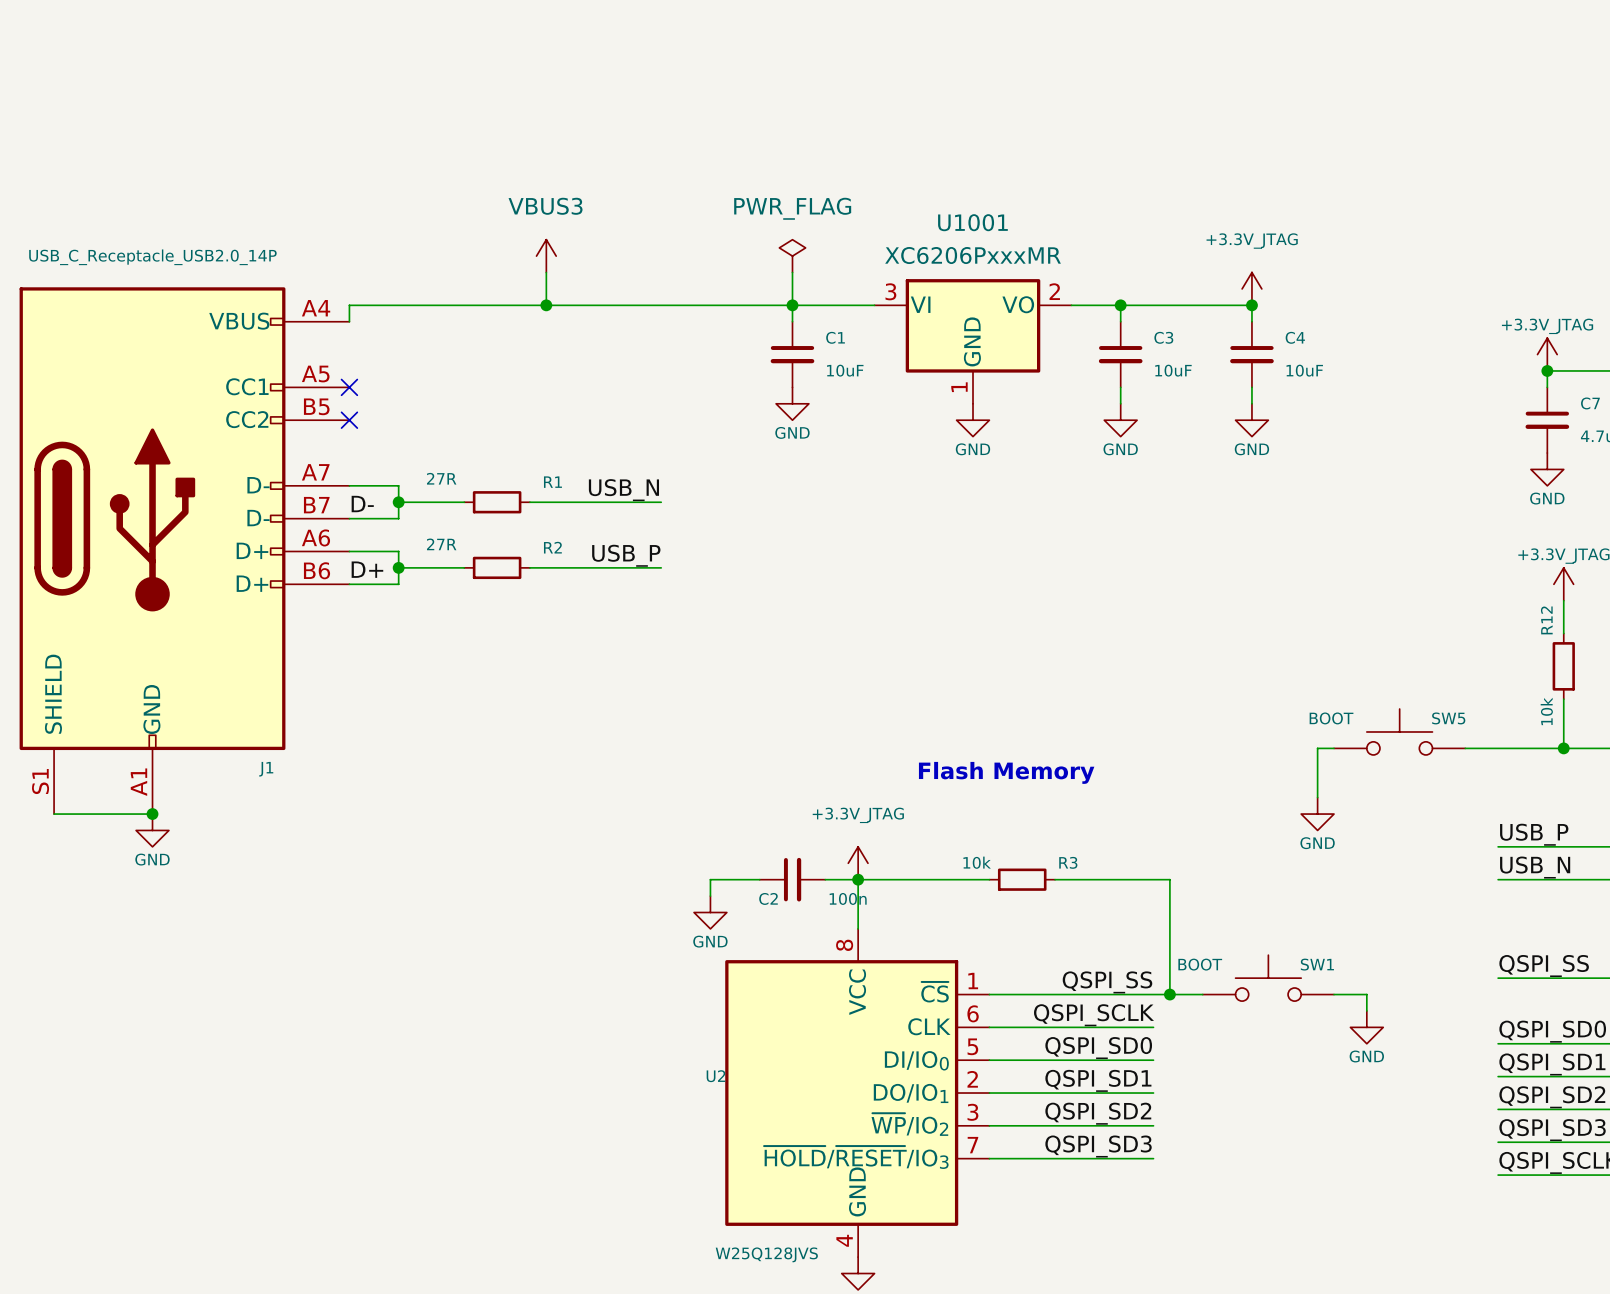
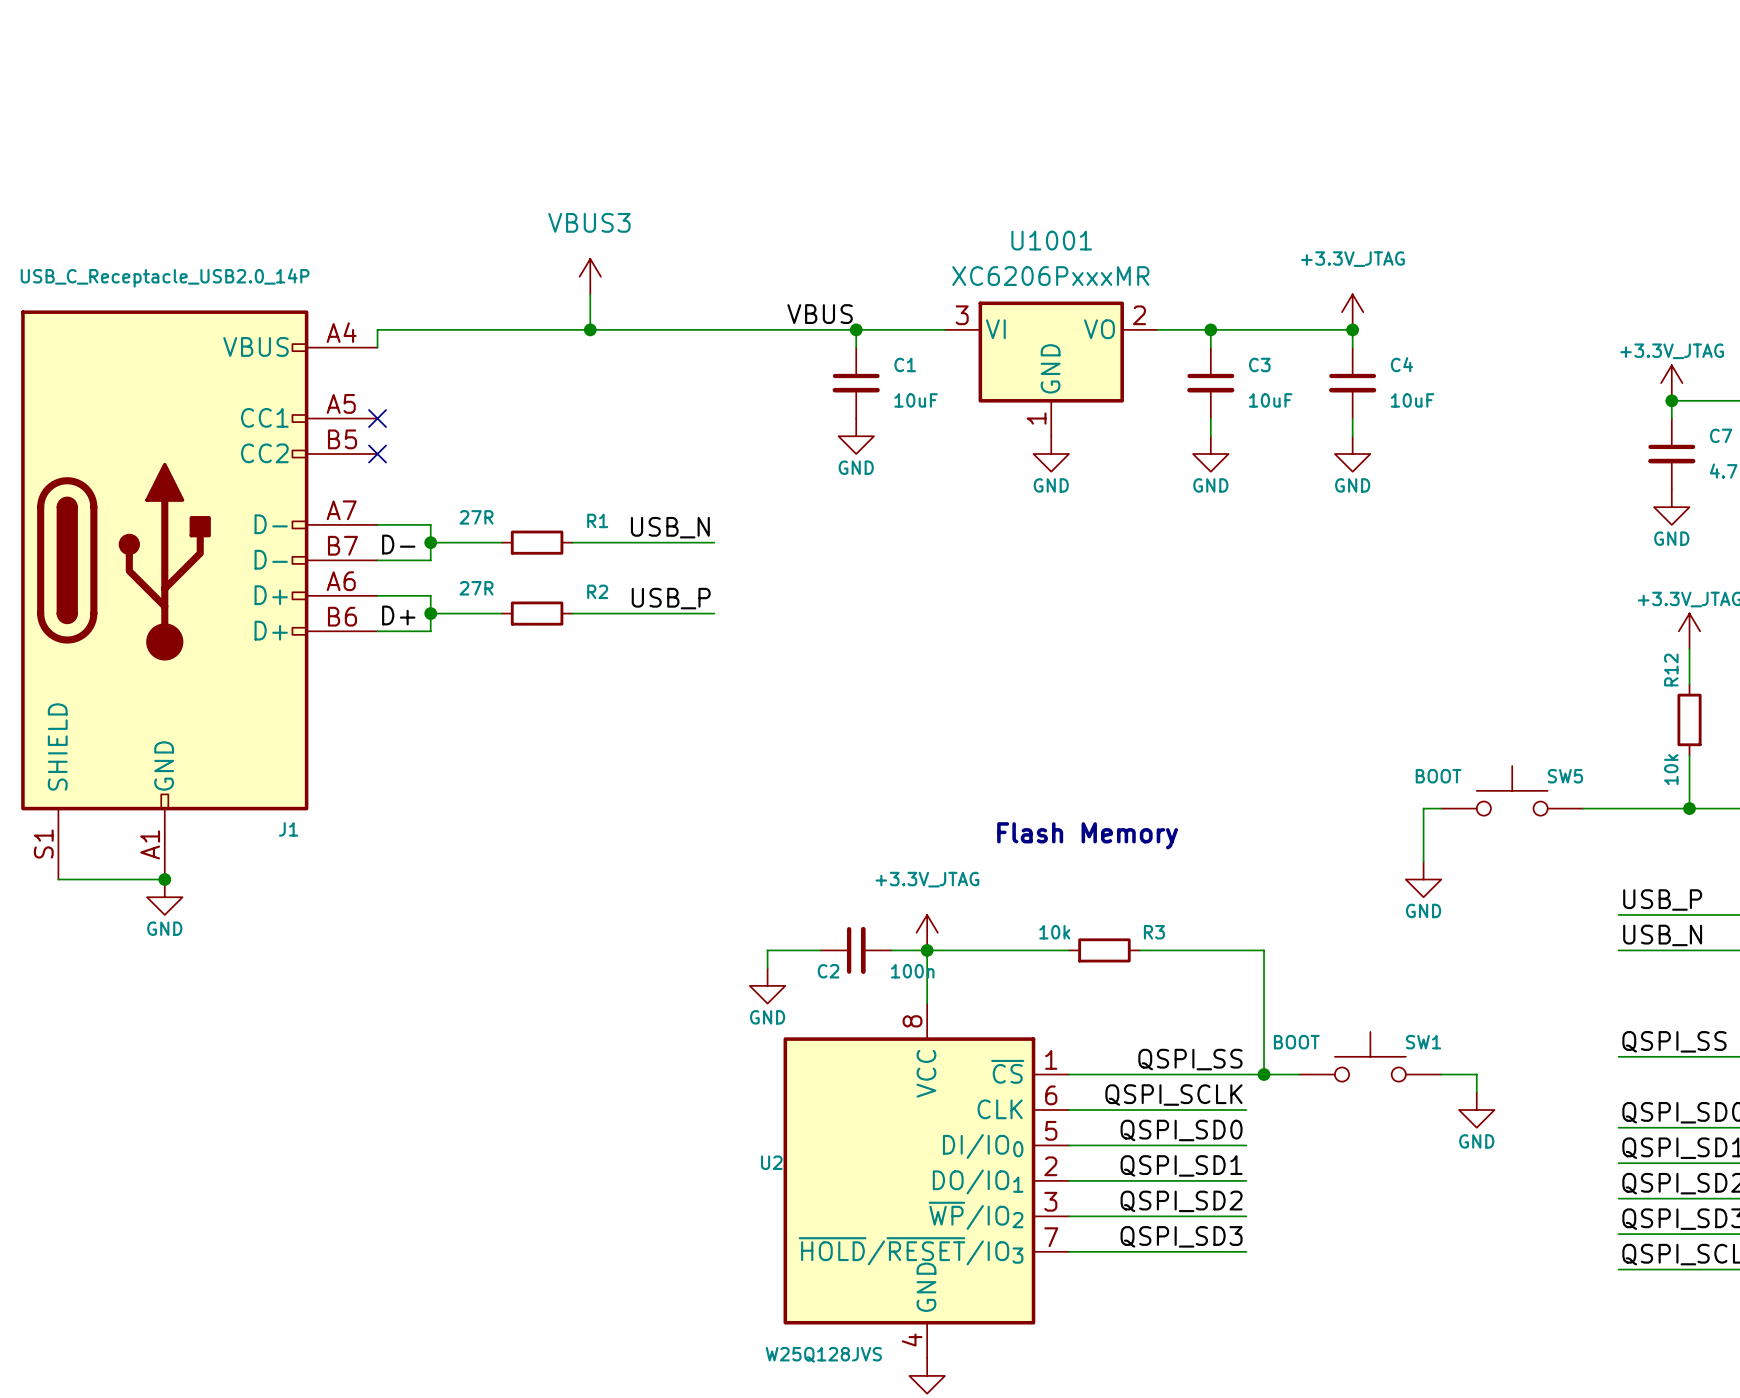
power symbol: PWR_FLAG (792, 256) -> none
wire: (792, 272) (792, 305) -> none
label: none -> VBUS (820, 314)

